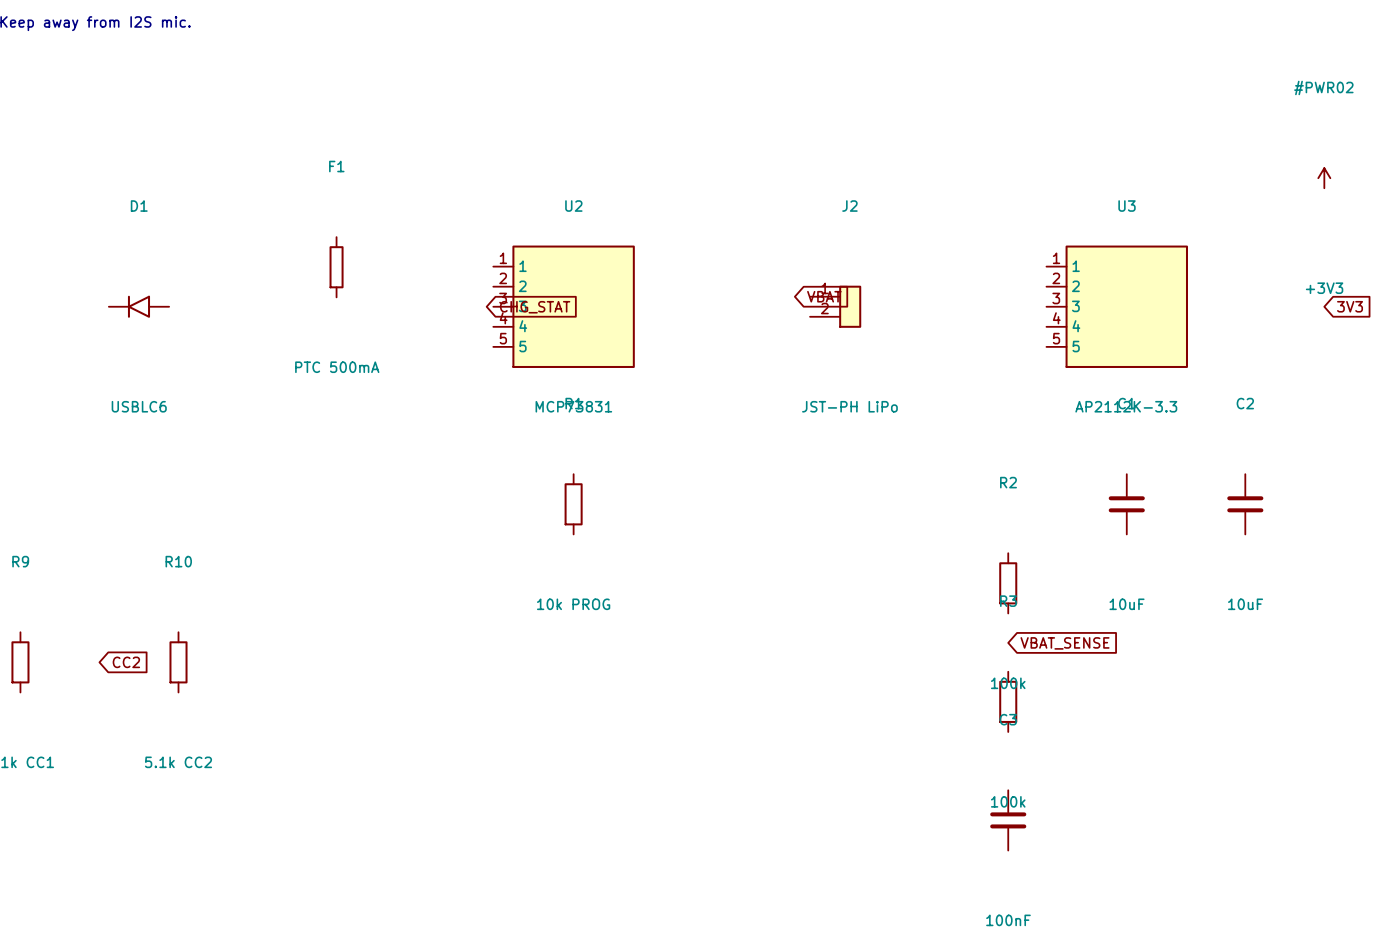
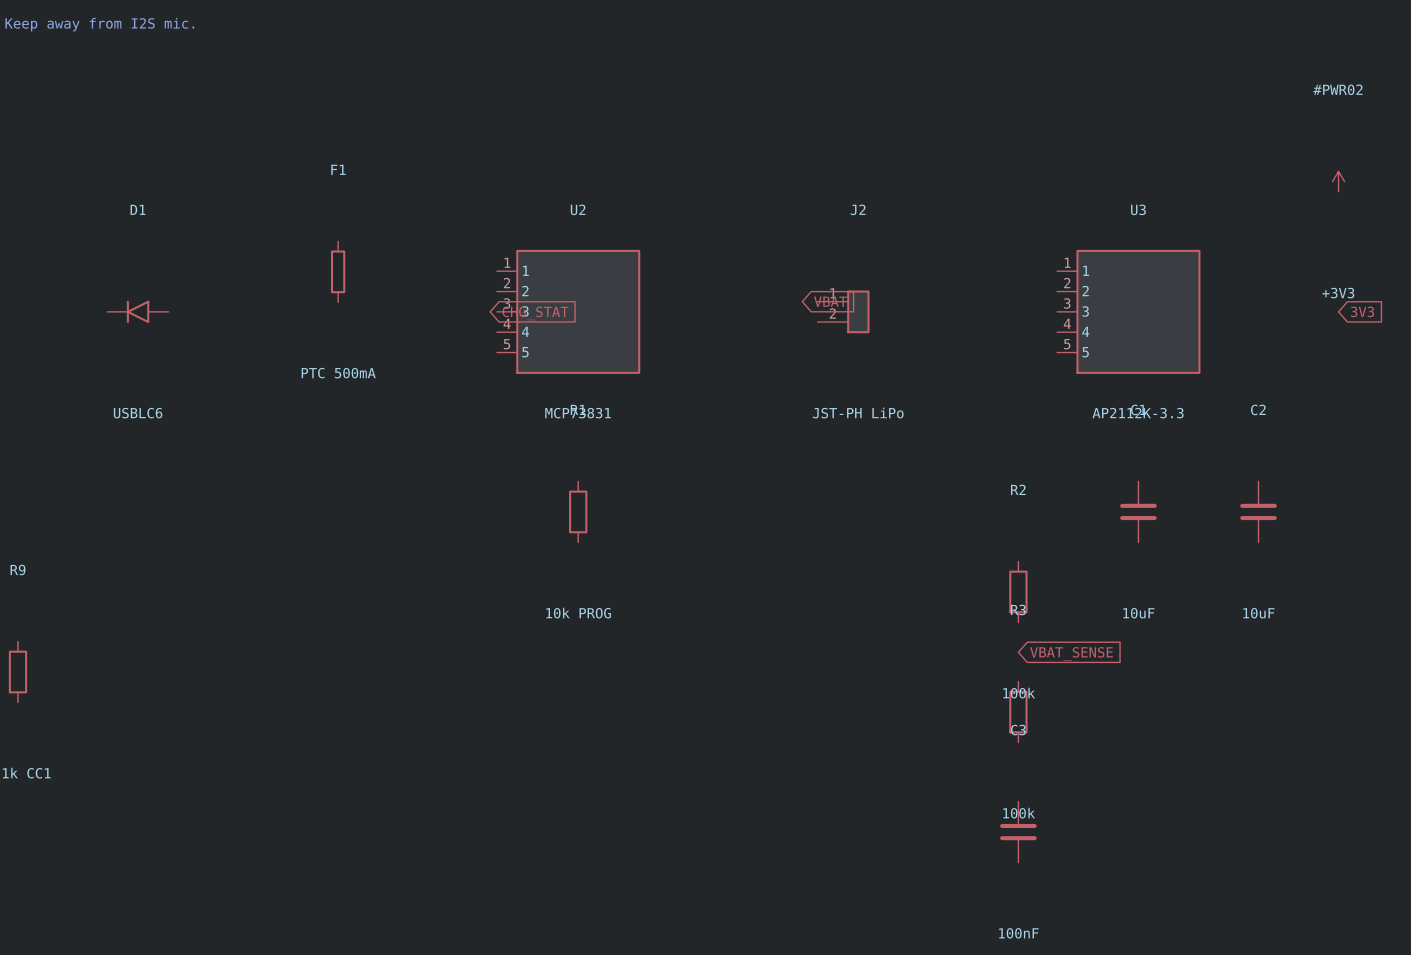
global label: CC2 (126, 662) -> none
R10: 5.1k CC2 (178, 662) -> none

